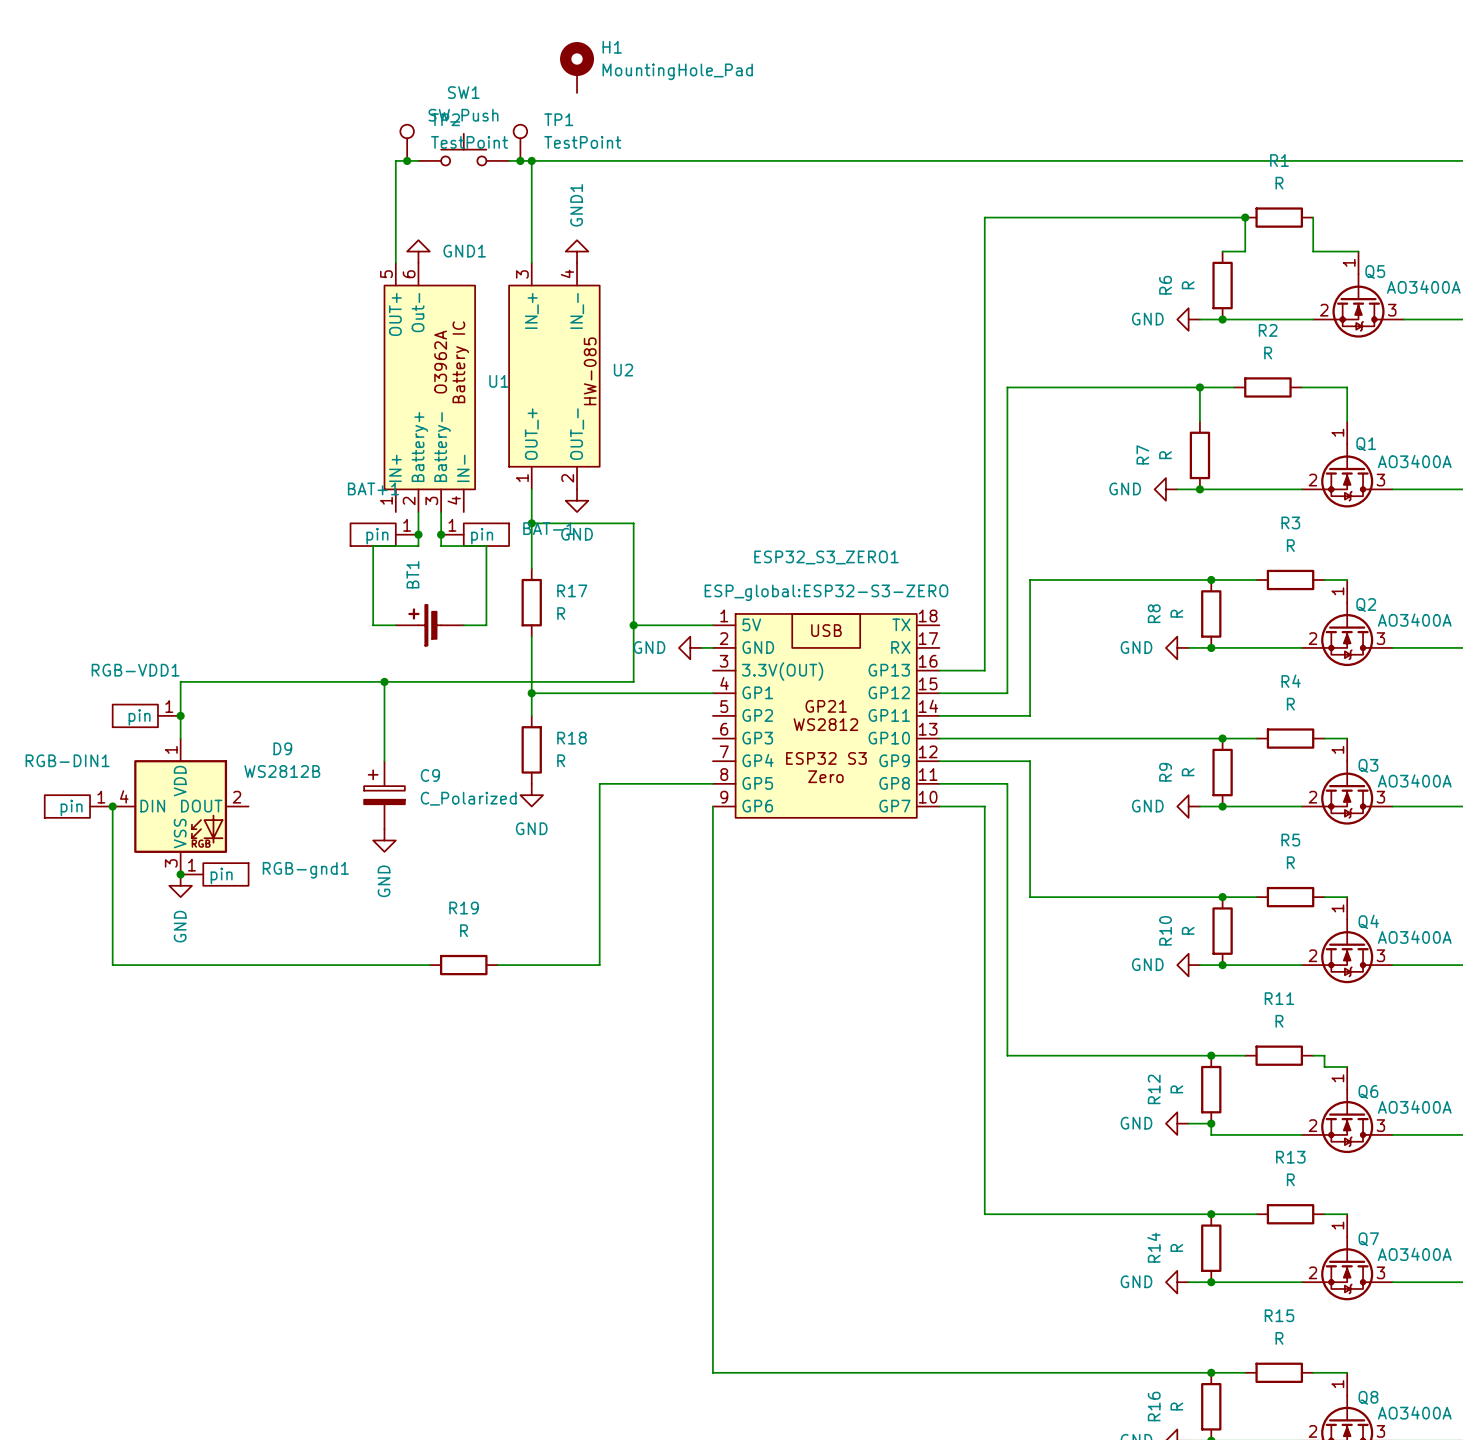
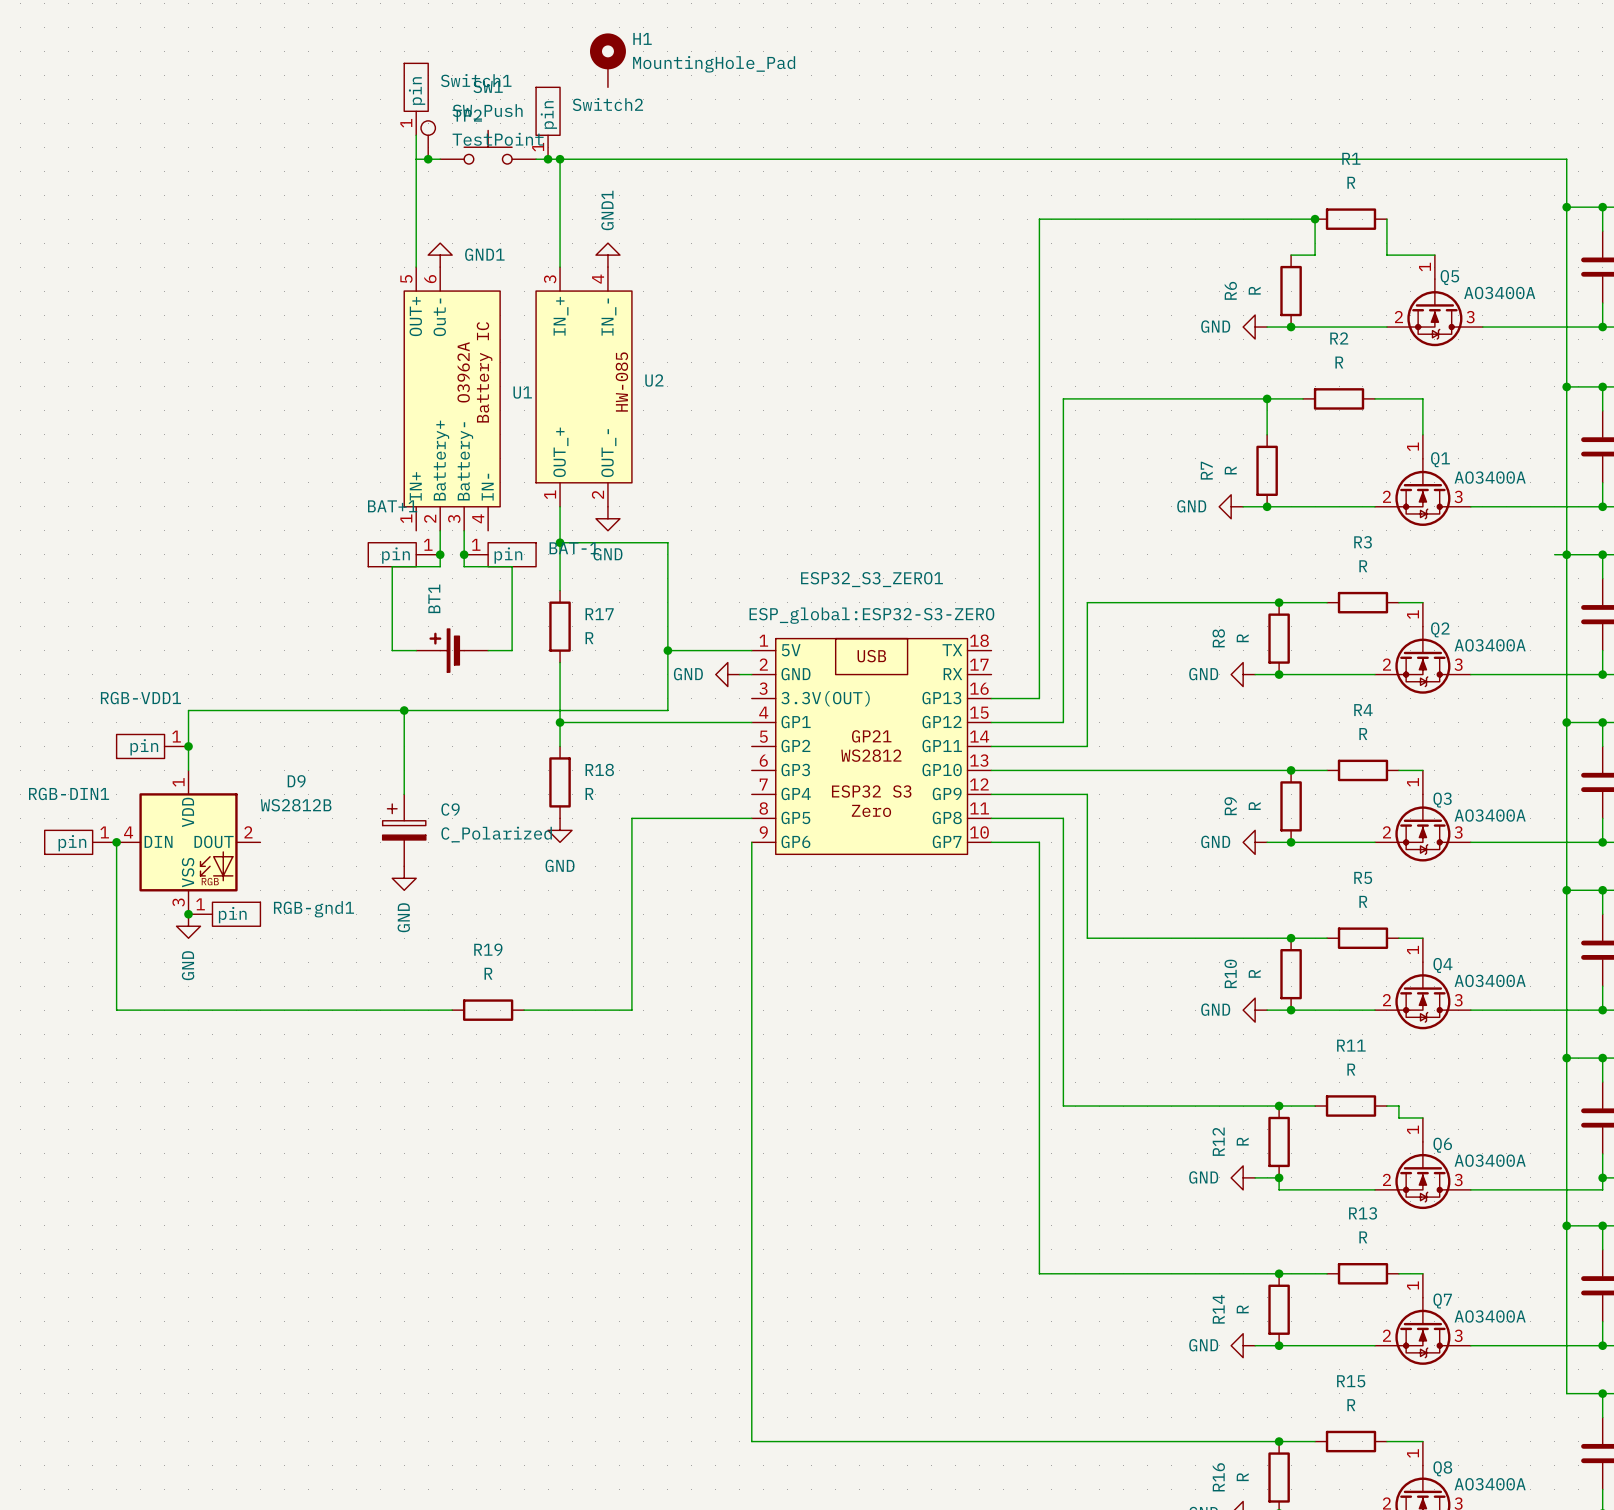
Switch1: none -> (416, 99)
Switch2: none -> (548, 123)
wire: none -> (416, 135) (416, 159)
TP1: TestPoint (520, 142) -> none

